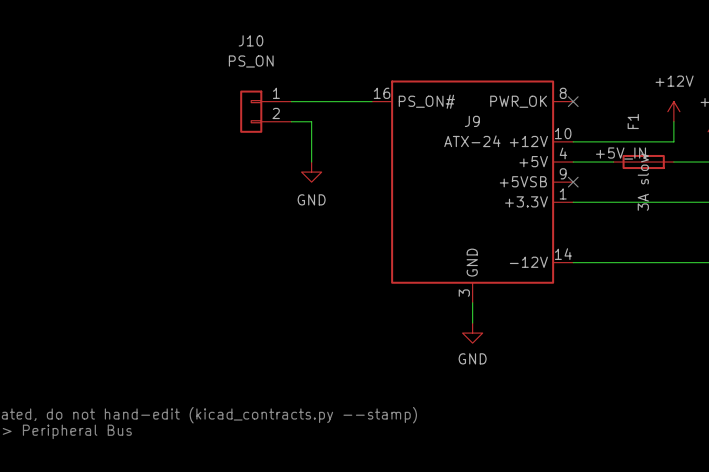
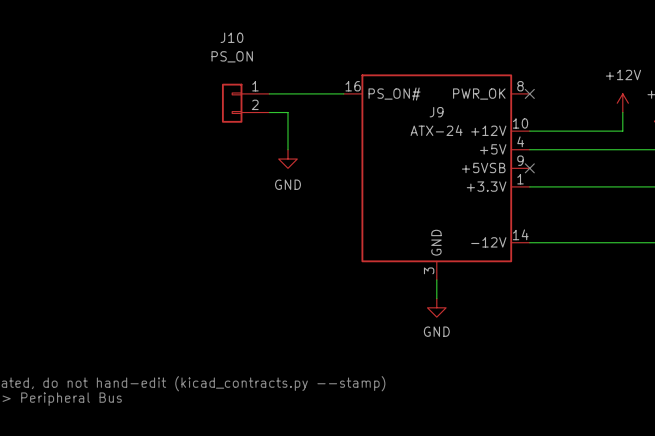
label: +5V_IN (621, 153) -> none
F1: 3A slow (643, 162) -> none

